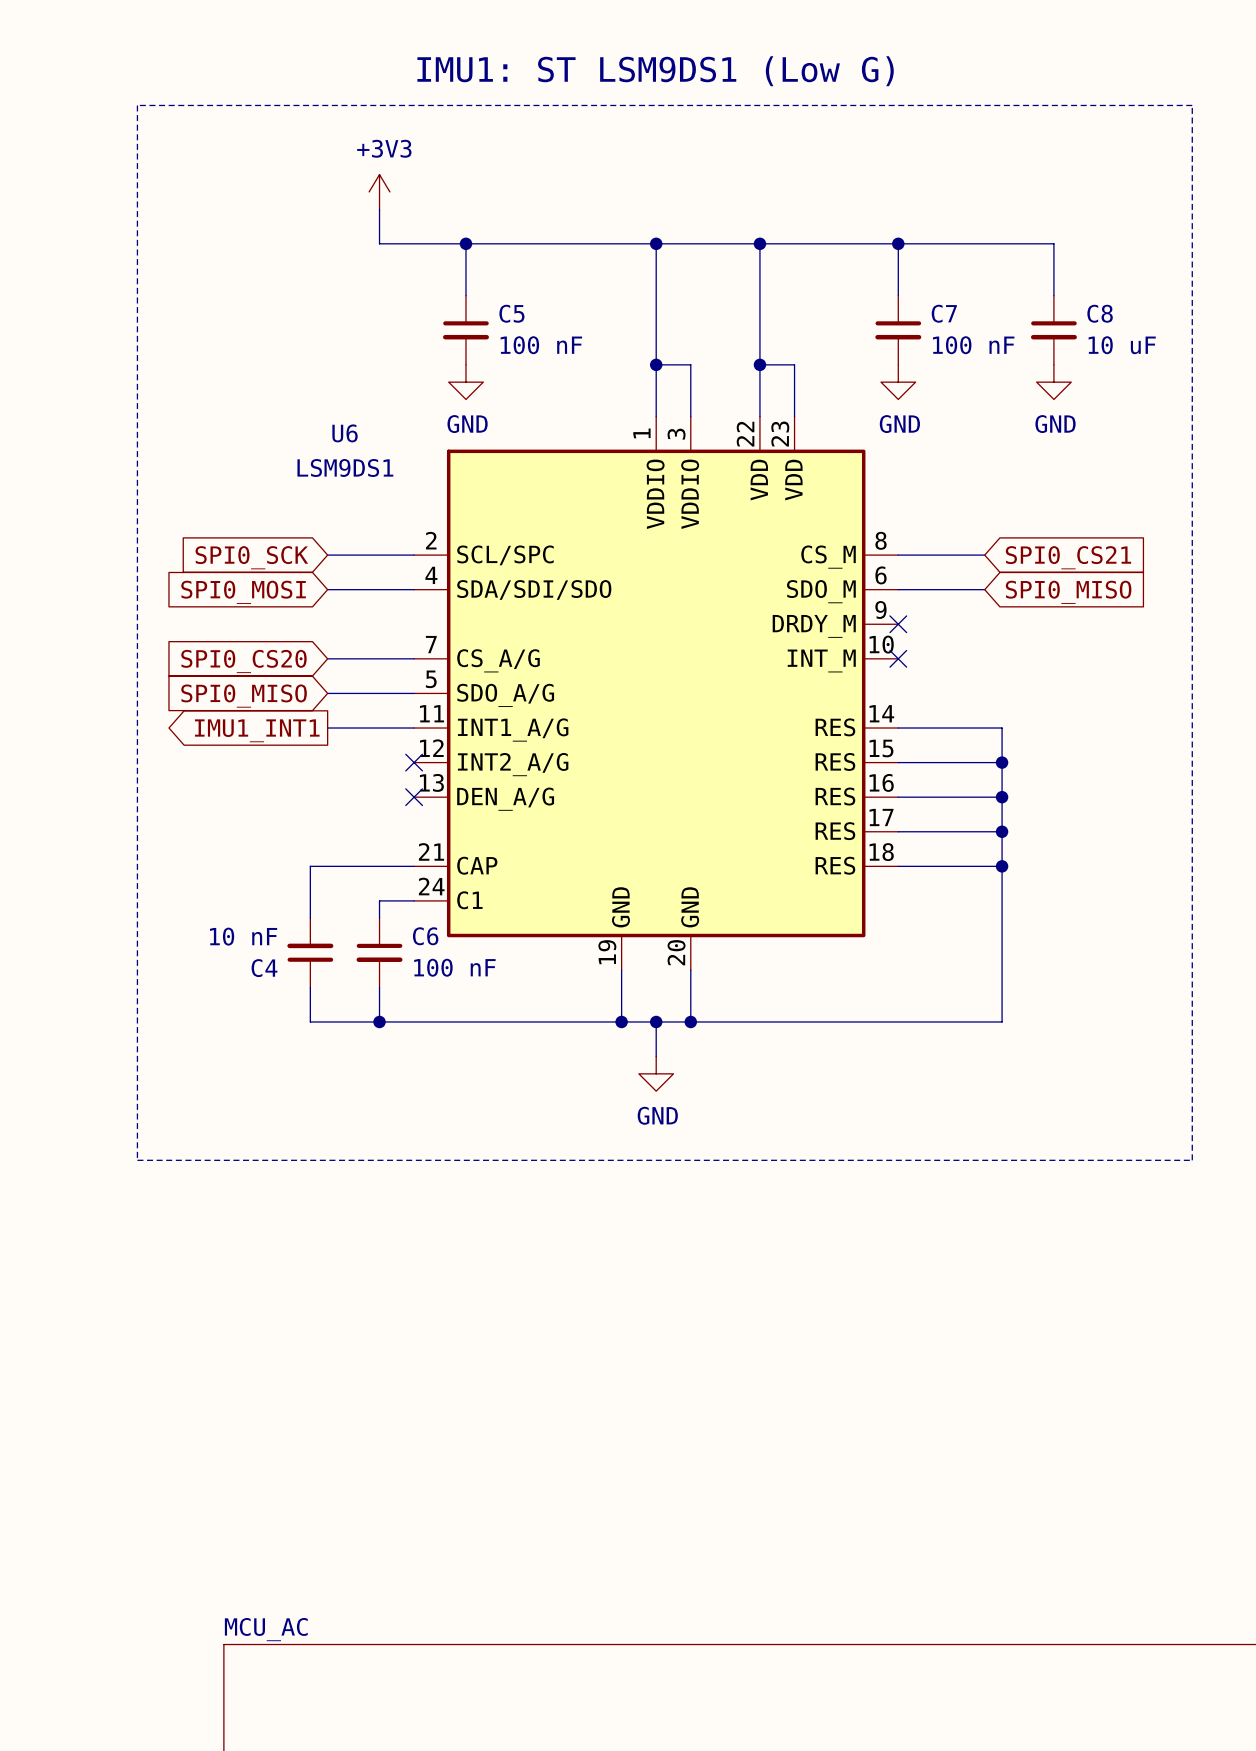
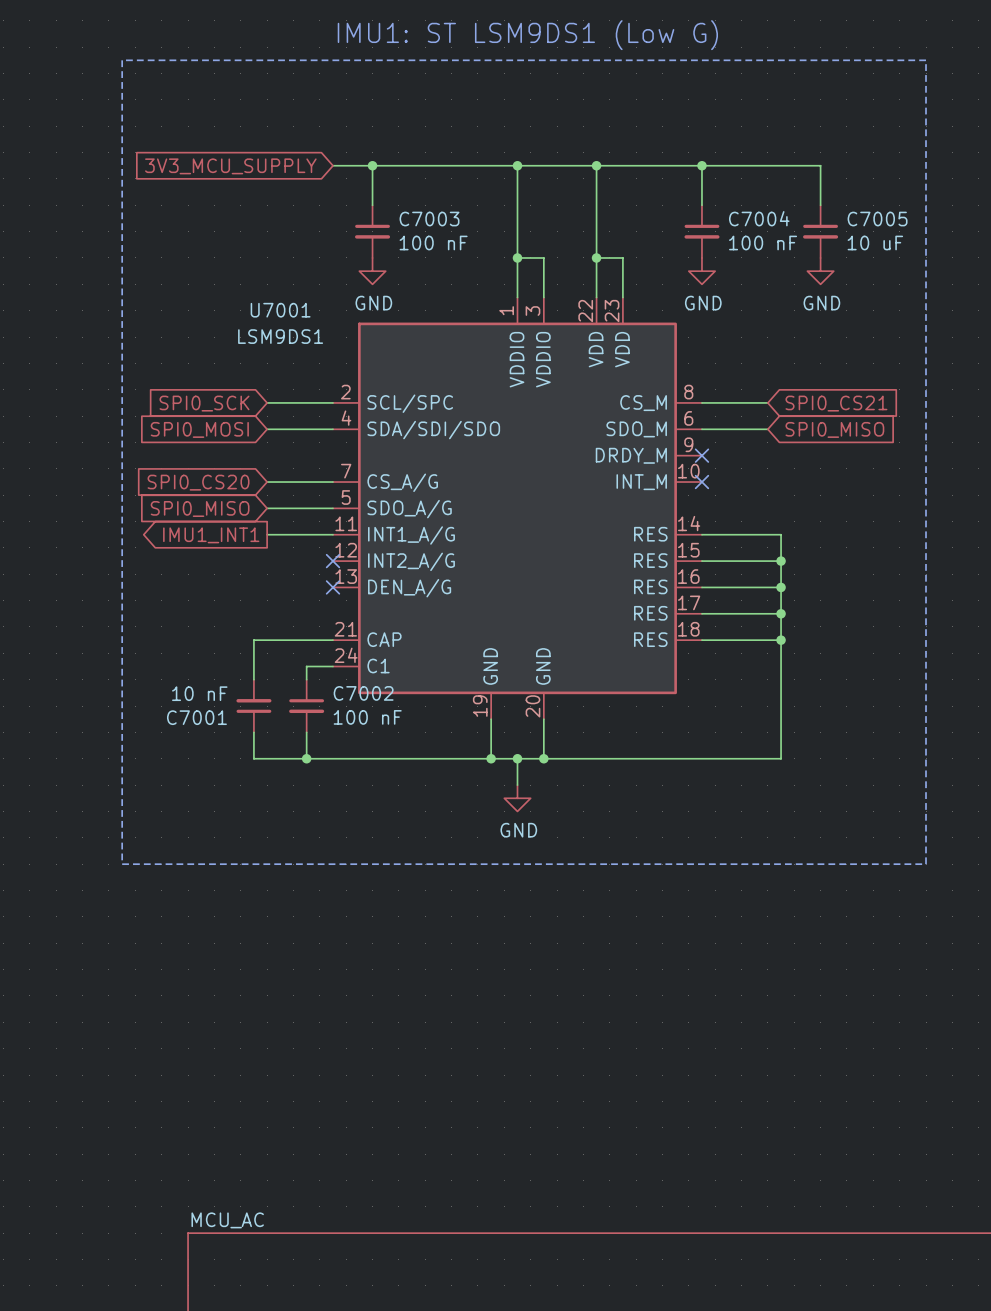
power symbol: +3V3 (379, 191) -> none
wire: (379, 209) (379, 243) (414, 243) -> none
global label: none -> 3V3_MCU_SUPPLY (230, 166)
C5 name: C5 (511, 313) -> C7003 (429, 219)
C7 name: C7 (944, 313) -> C7004 (759, 218)
C8 name: C8 (1100, 313) -> C7005 (877, 219)
U6 name: U6 (345, 433) -> U7001 (280, 310)
C6 name: C6 (425, 936) -> C7002 (363, 693)
C4 name: C4 (264, 968) -> C7001 (196, 717)

